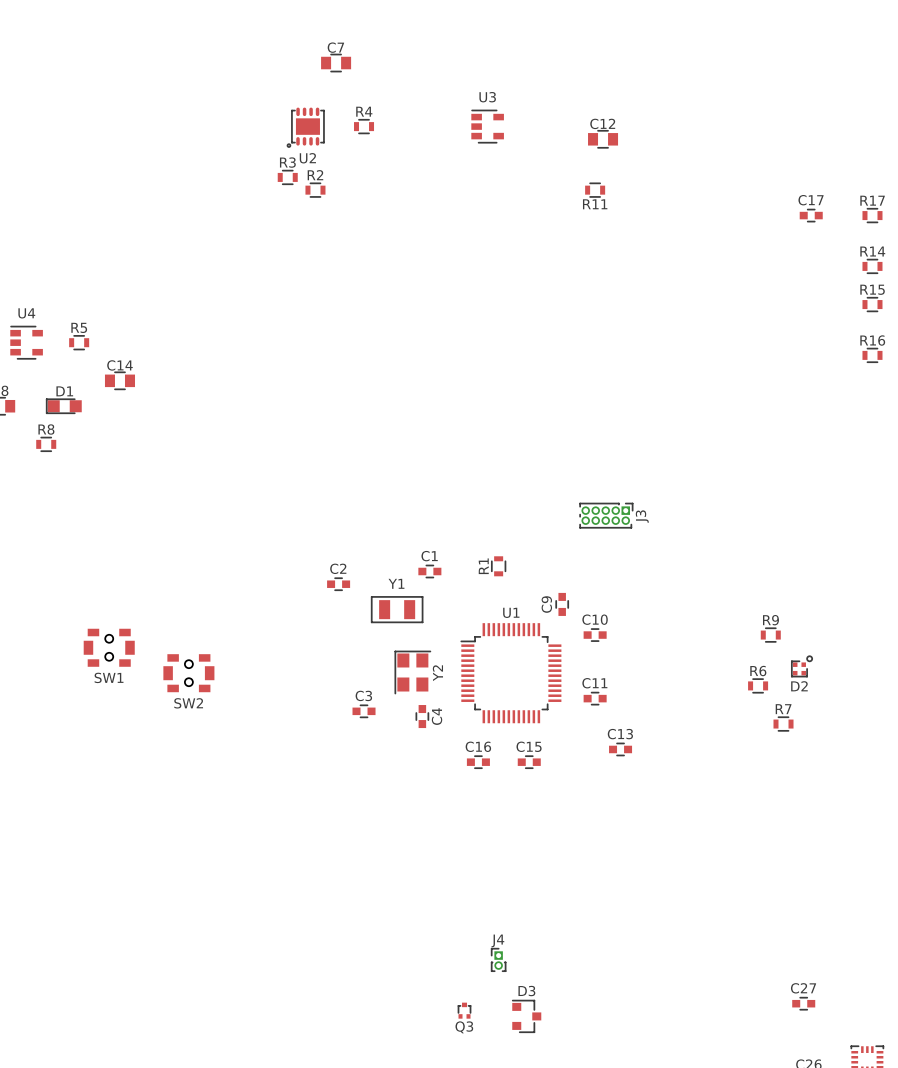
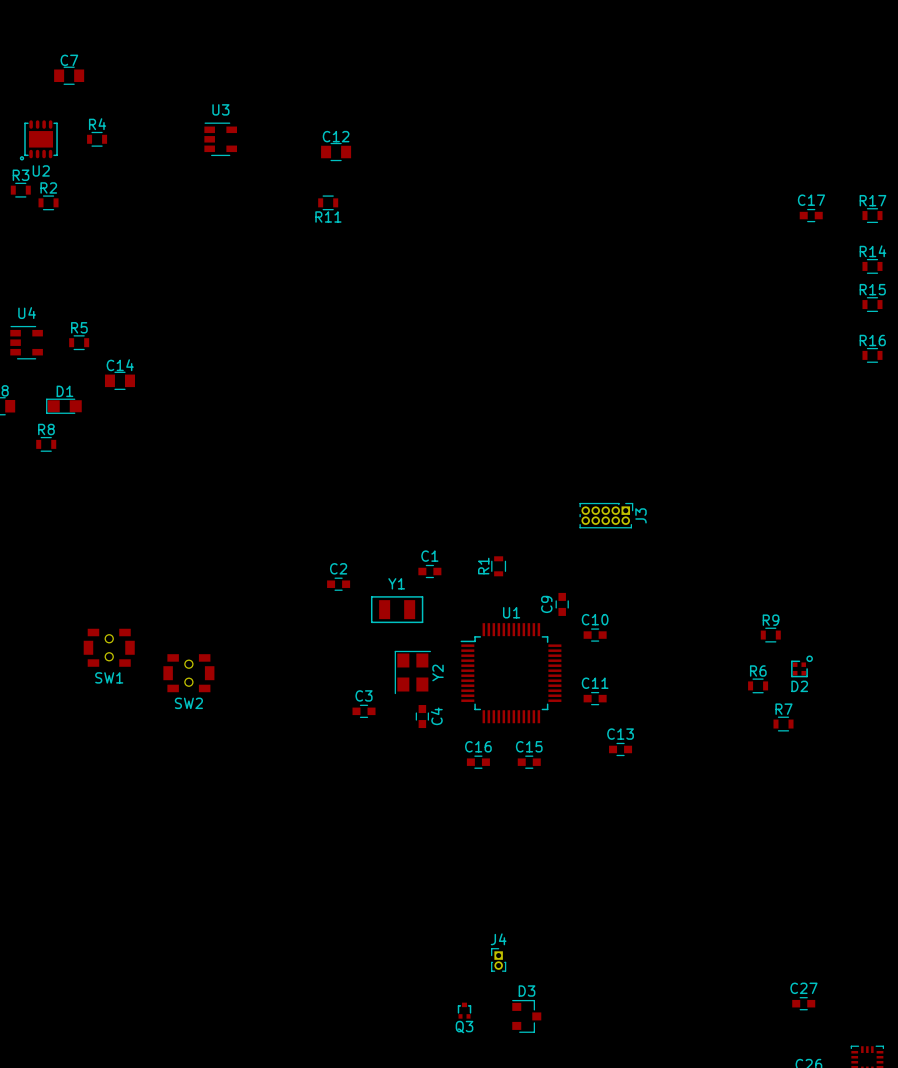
C7 position: (336, 63) -> (69, 75)
R4 position: (364, 126) -> (97, 139)
U3 position: (487, 126) -> (220, 139)
U2 position: (305, 127) -> (38, 140)
C12 position: (603, 139) -> (336, 152)
R3 position: (287, 177) -> (20, 190)
R2 position: (315, 190) -> (48, 202)
R11 position: (595, 190) -> (328, 202)

